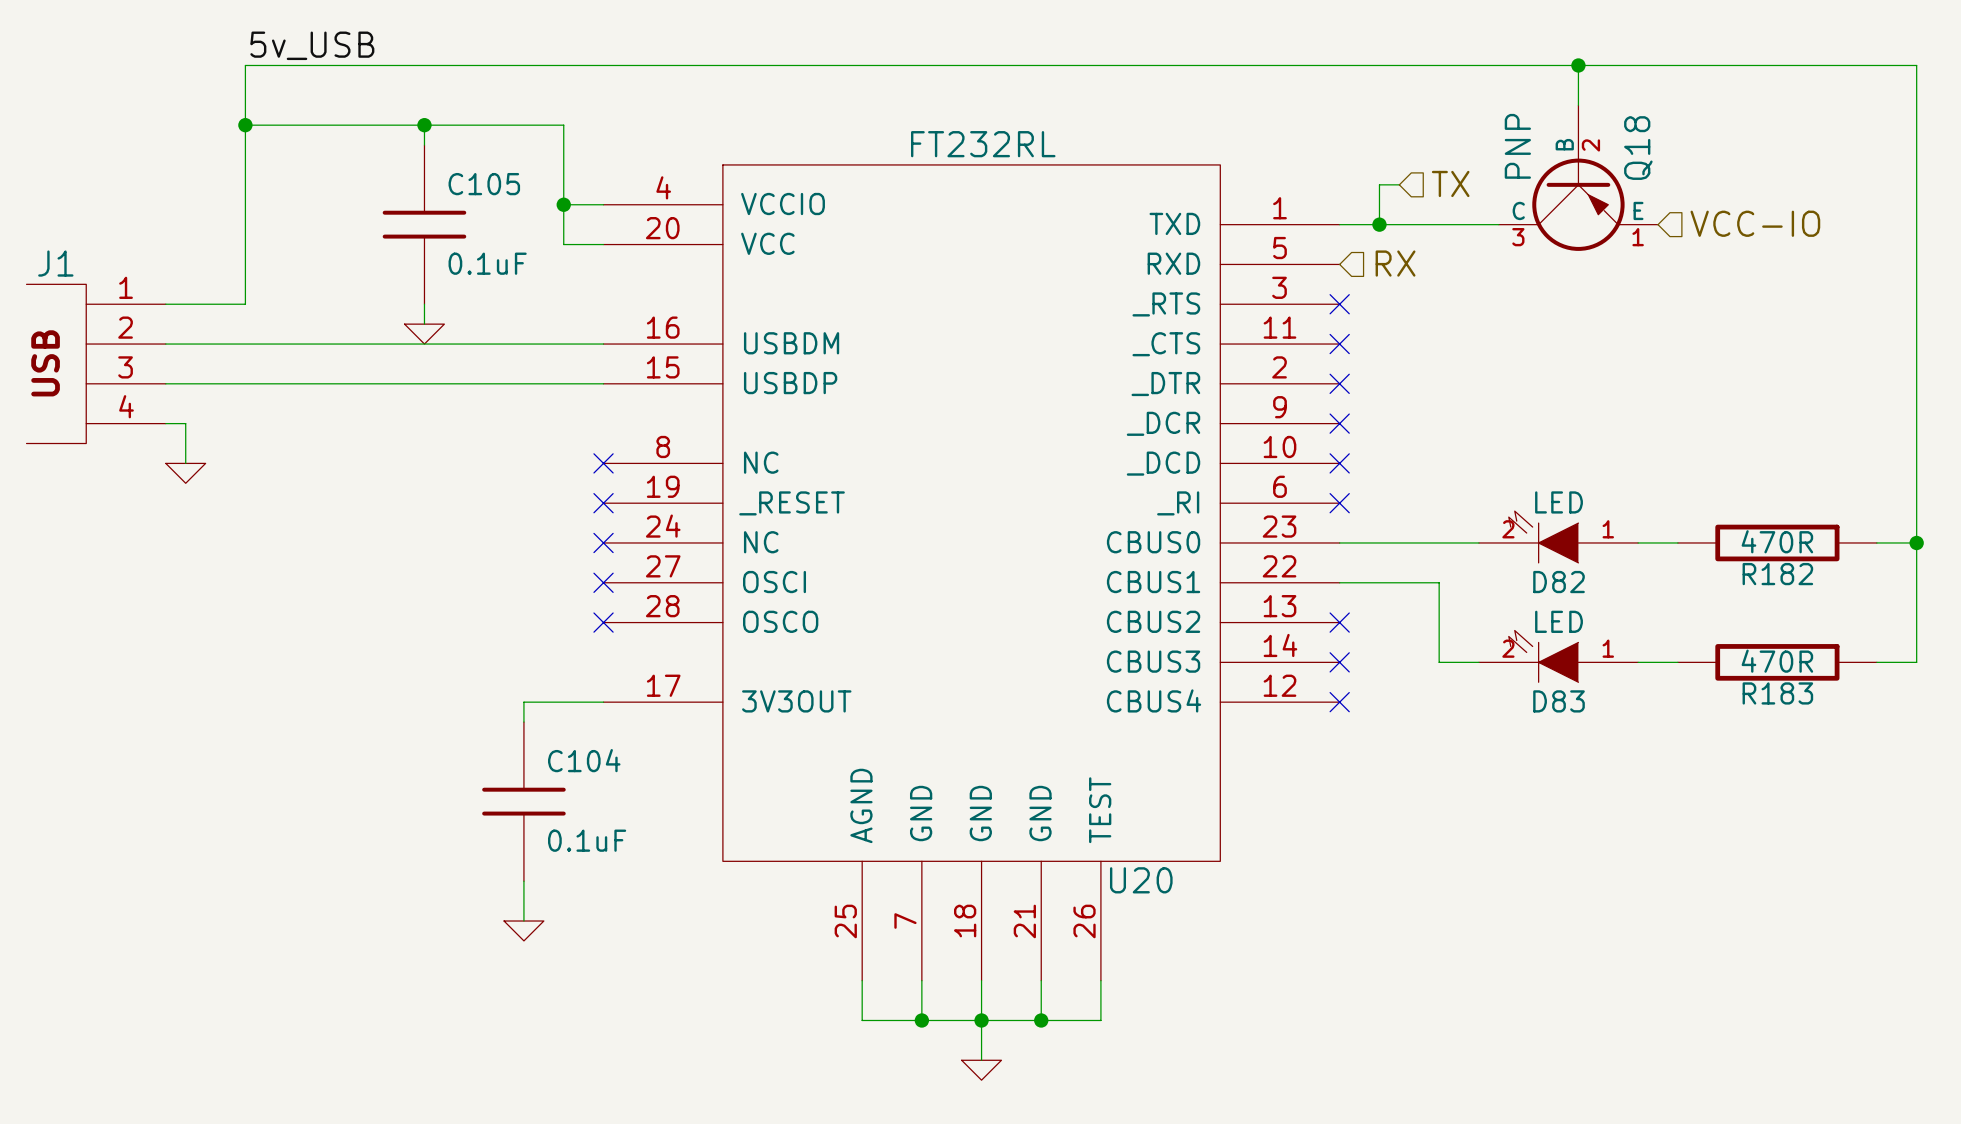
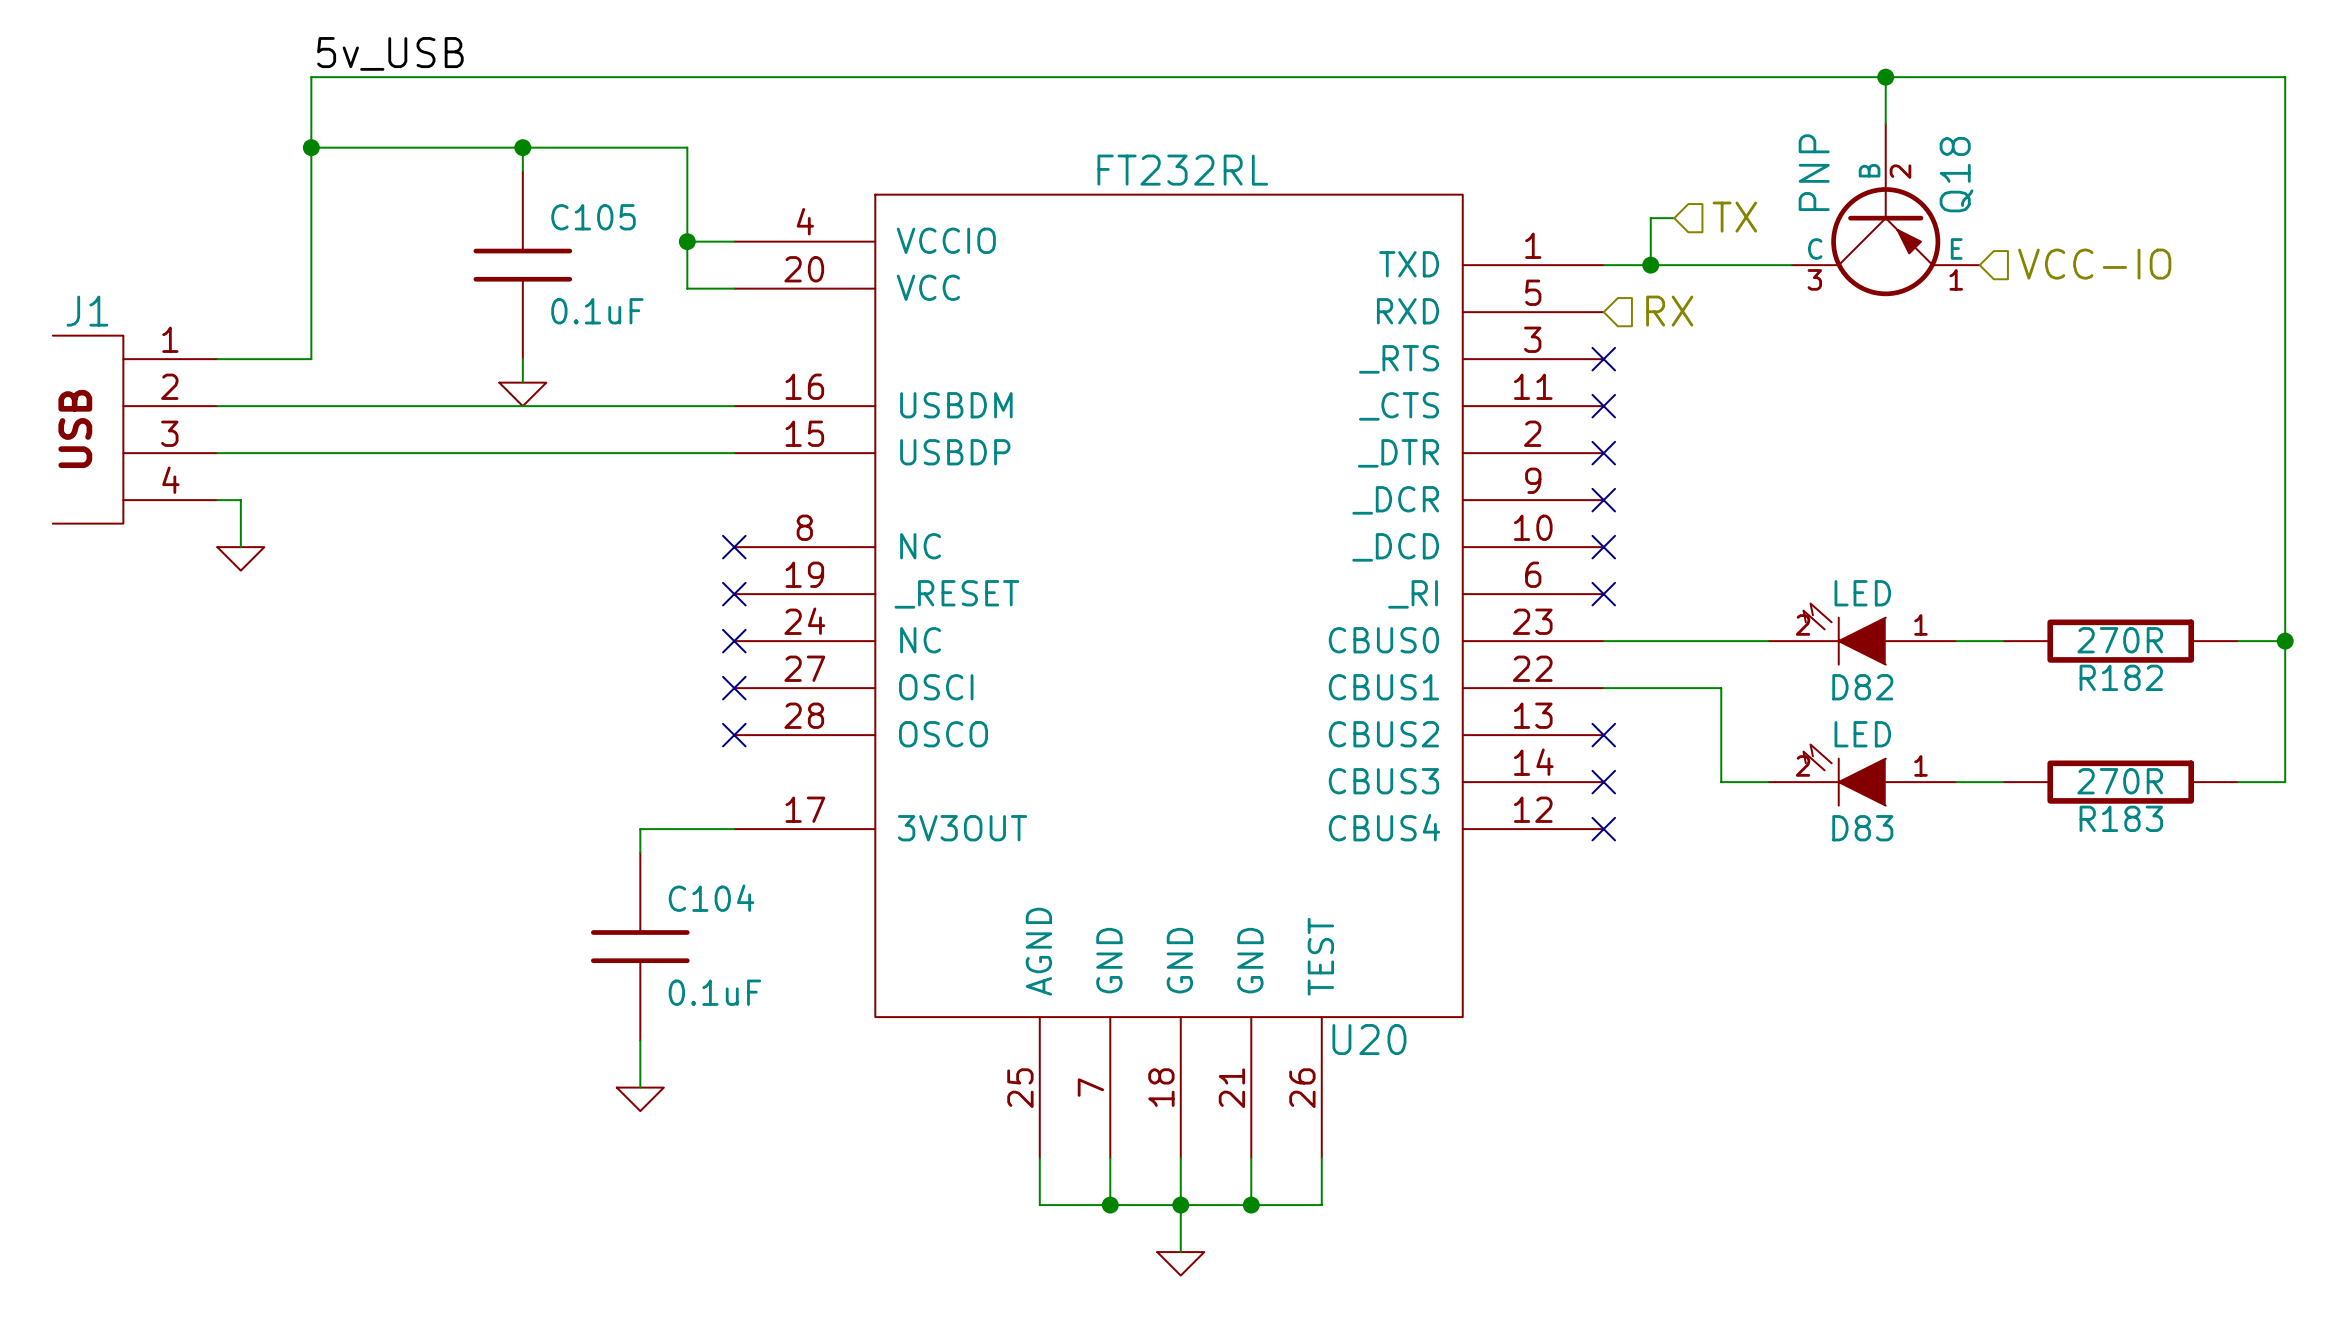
R182 value: 470R (1777, 541) -> 270R (2120, 640)
R183 value: 470R (1777, 661) -> 270R (2120, 781)

